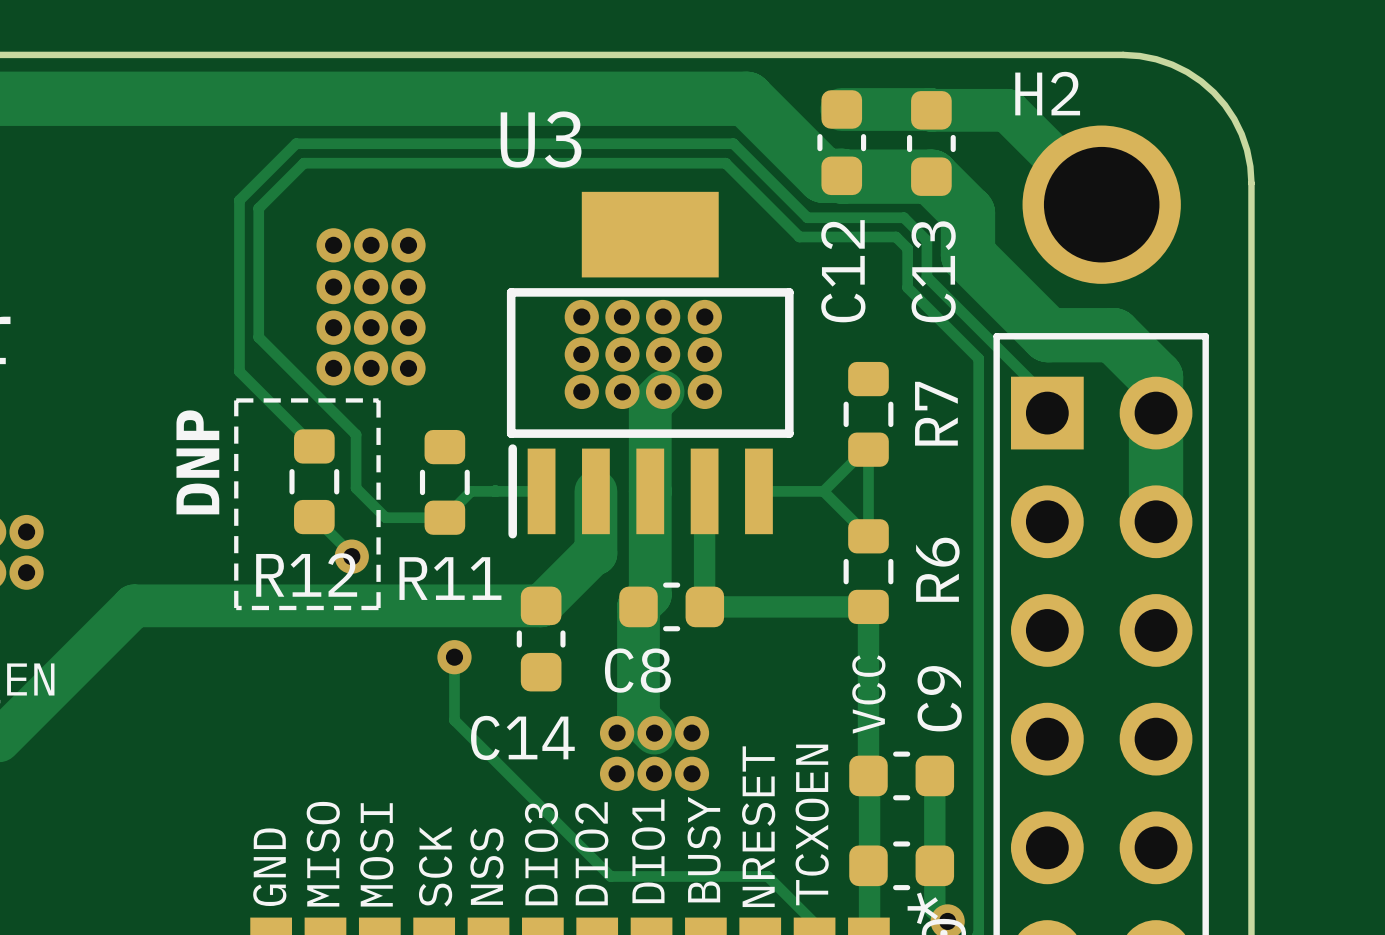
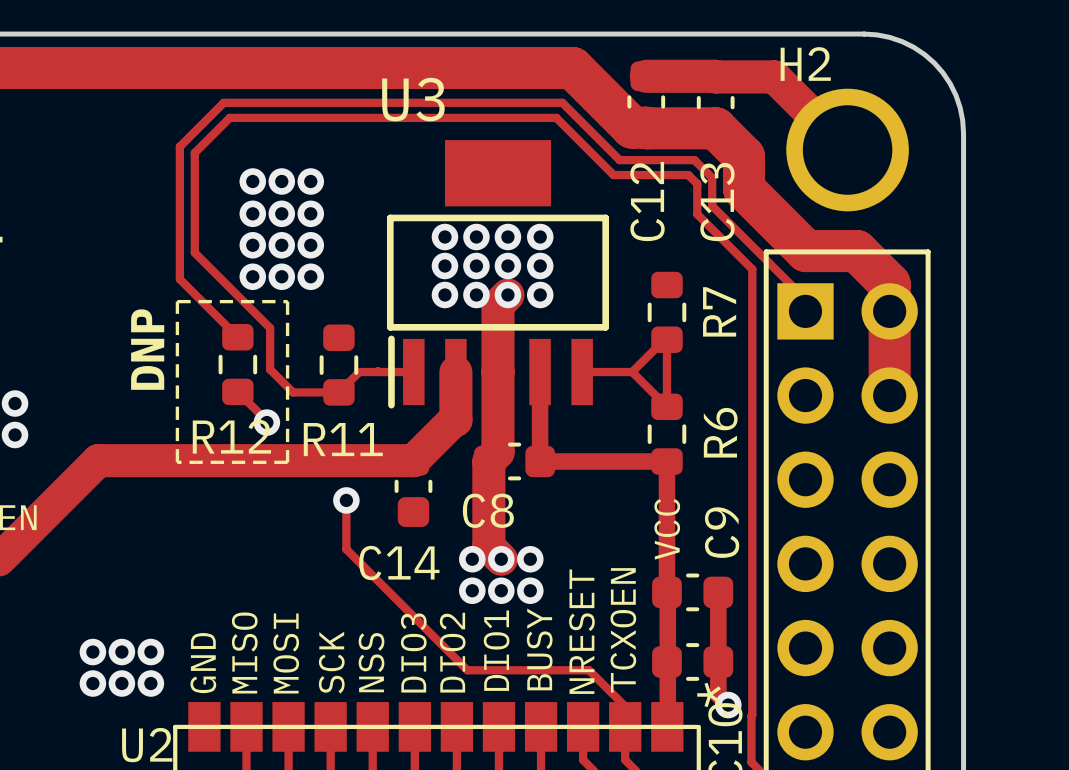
via: none -> (92, 652)
via: none -> (121, 652)
via: none -> (150, 652)
via: none -> (92, 683)
via: none -> (121, 683)
via: none -> (150, 683)

